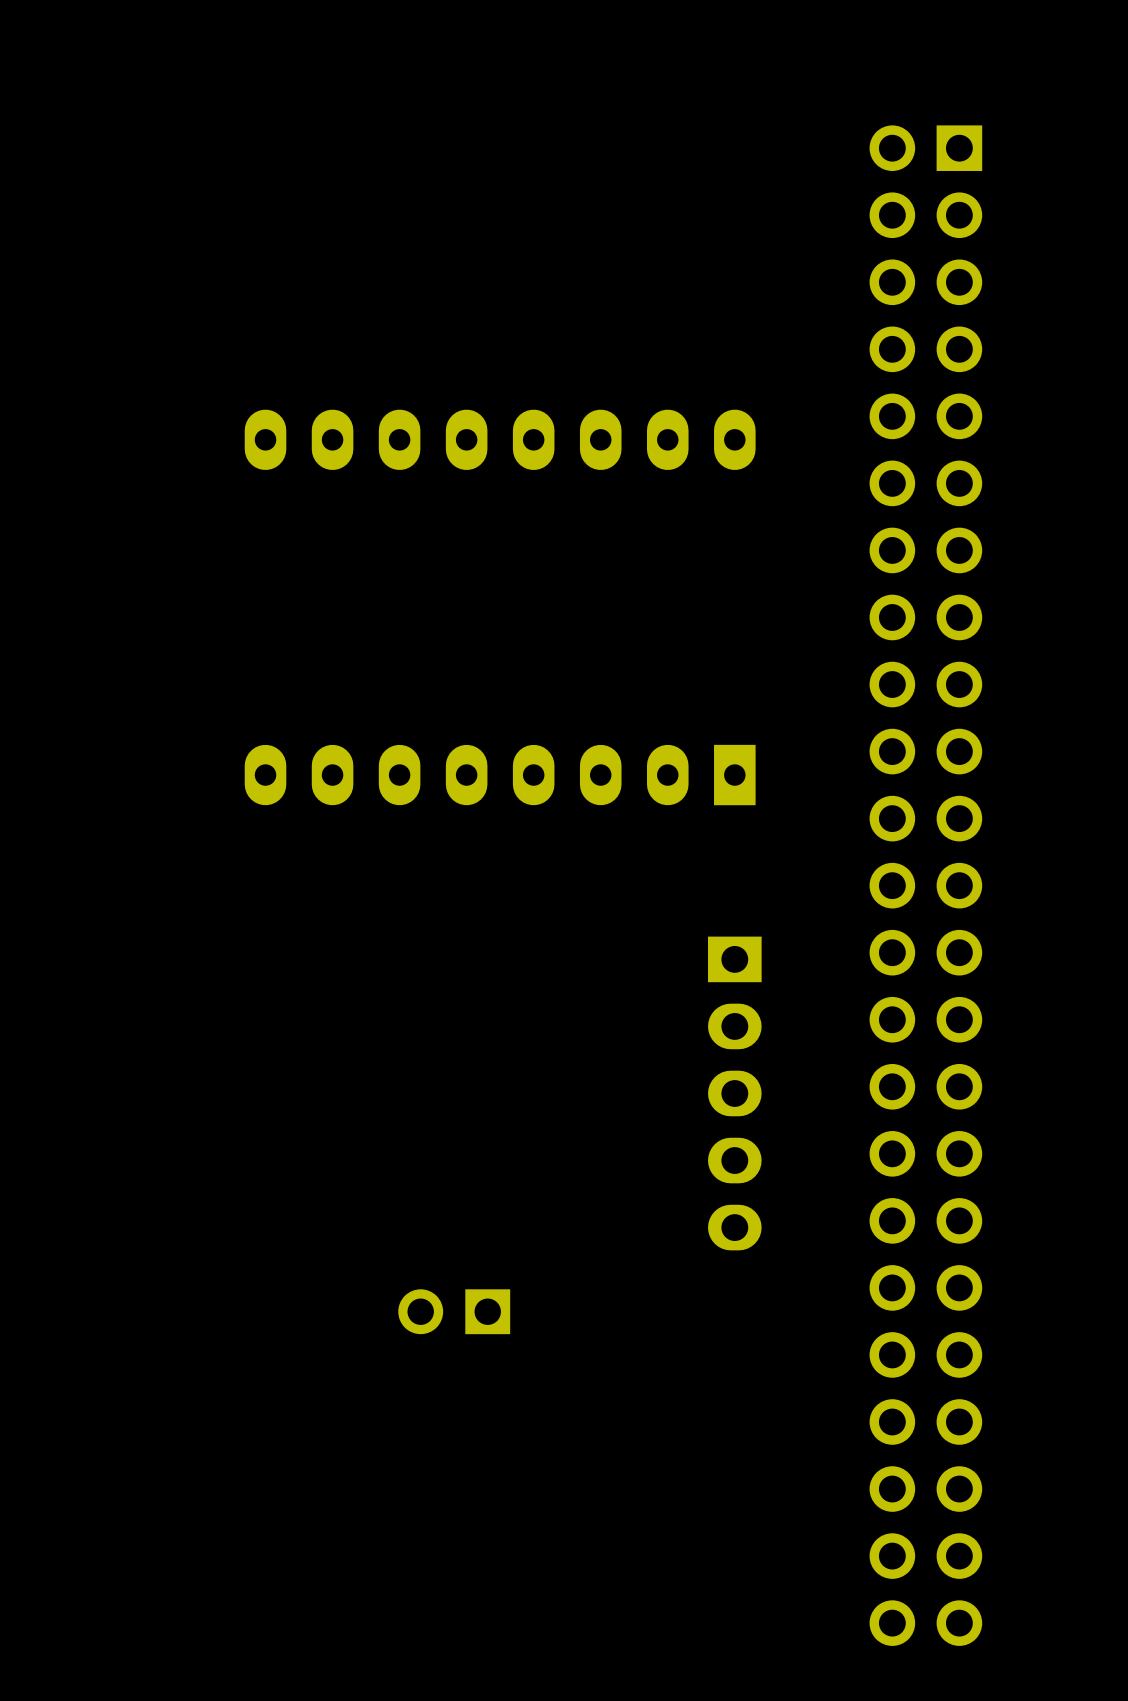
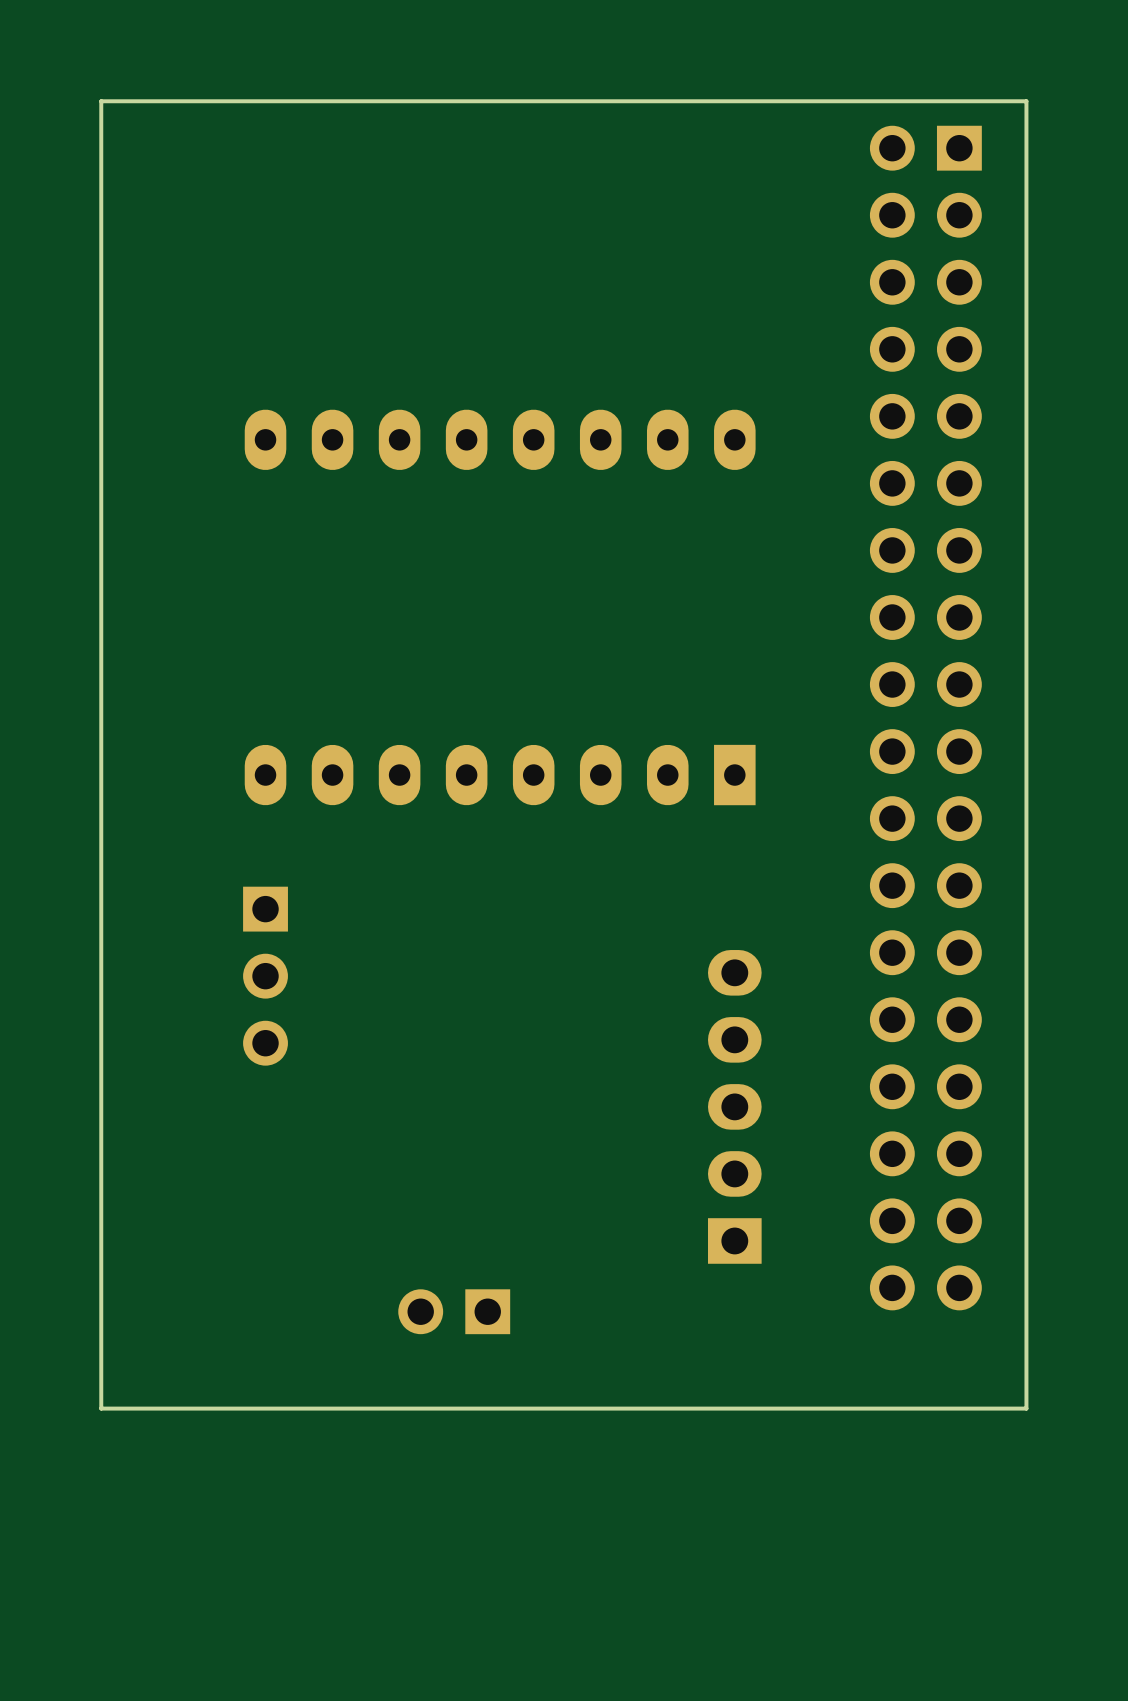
board edge: none -> (1026, 101) (1026, 1408) (101, 1408) (101, 101) (1026, 101)
part: none -> (925, 718)
part: (925, 885) -> none
part: none -> (265, 976)
part rotation: 0° (734, 1093) -> 180° (734, 1106)

